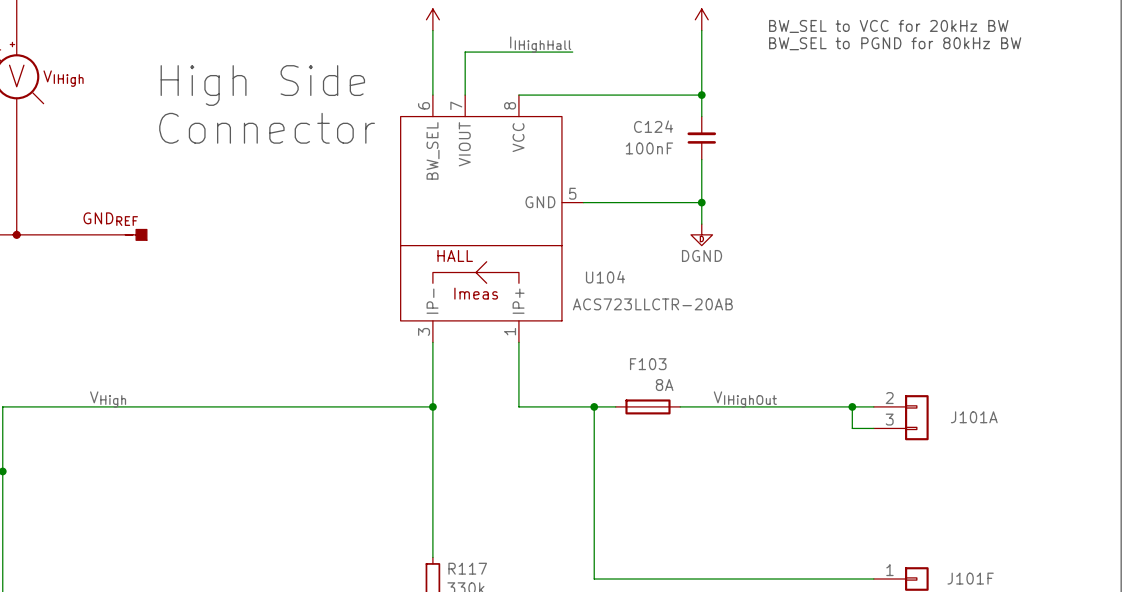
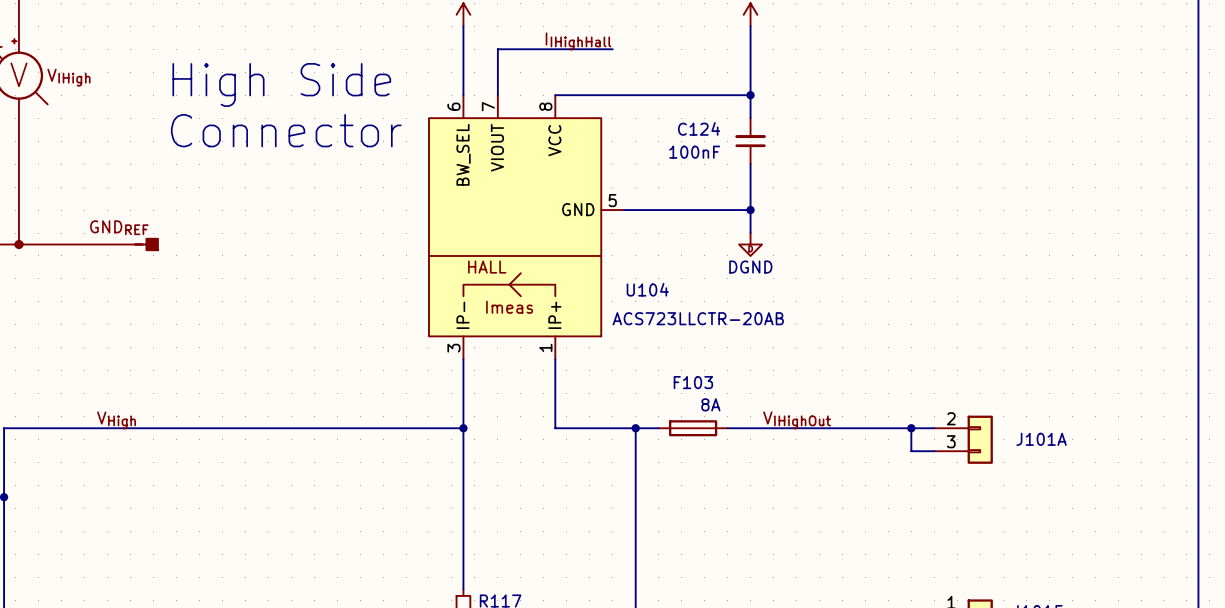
text: BW_SEL to VCC for 20kHz BW (888, 26) -> none
text: BW_SEL to PGND for 80kHz BW (895, 43) -> none

